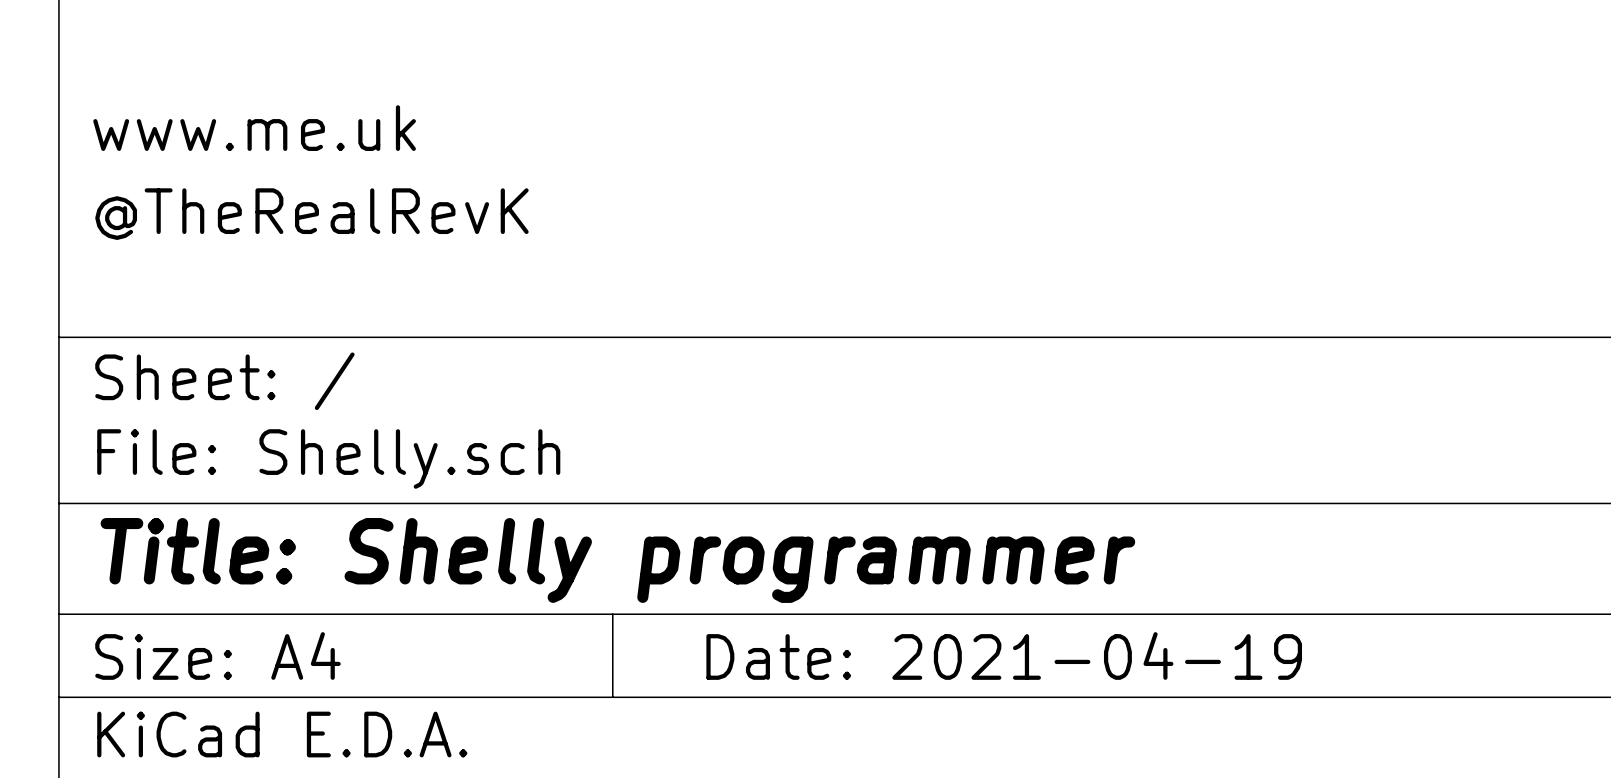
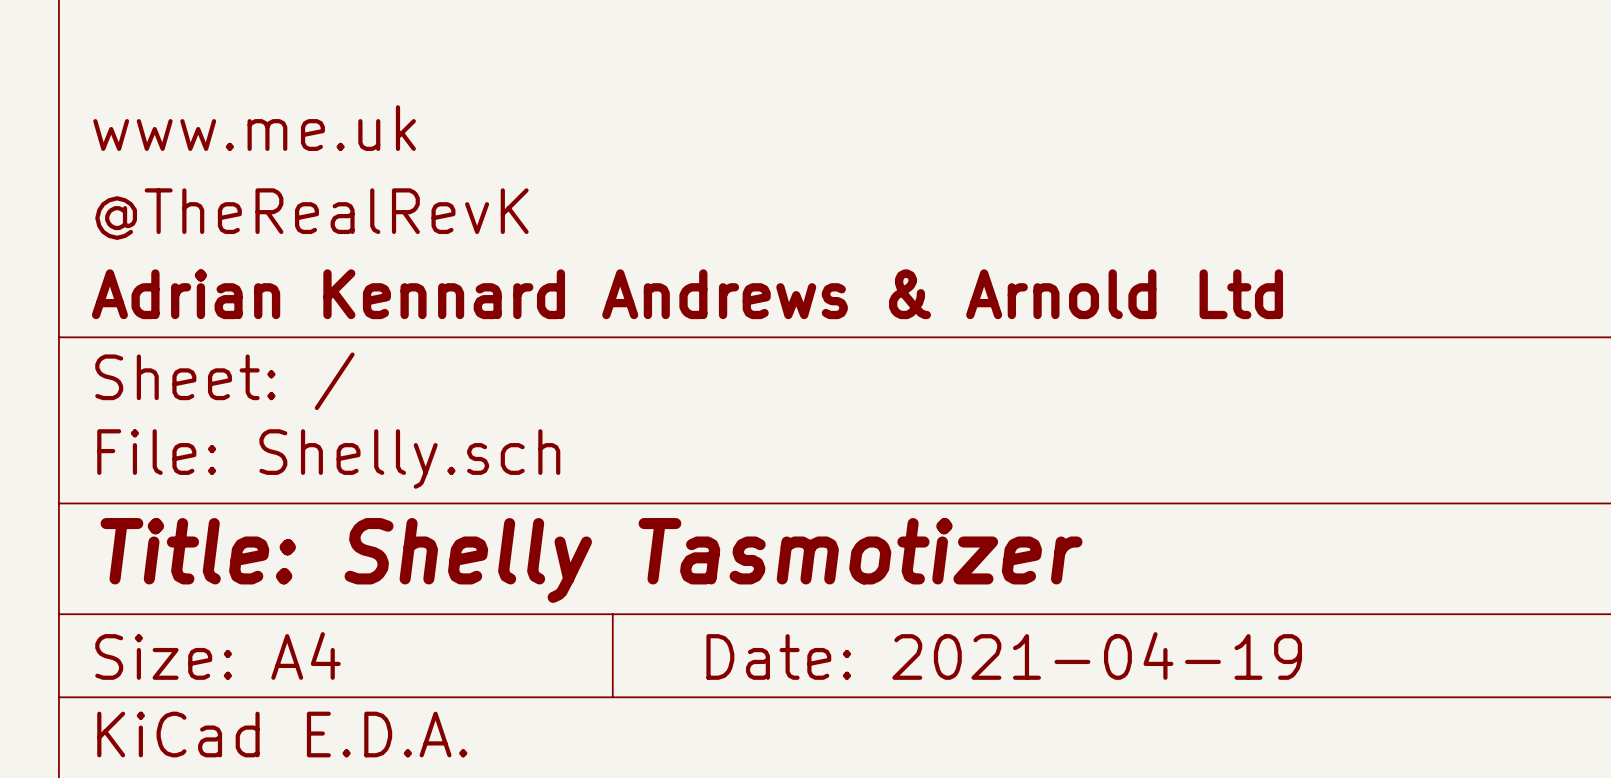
title block: none -> Adrian Kennard Andrews & Arnold Ltd (687, 294)
title block: Title: Shelly programmer (617, 560) -> Title: Shelly Tasmotizer (591, 560)

